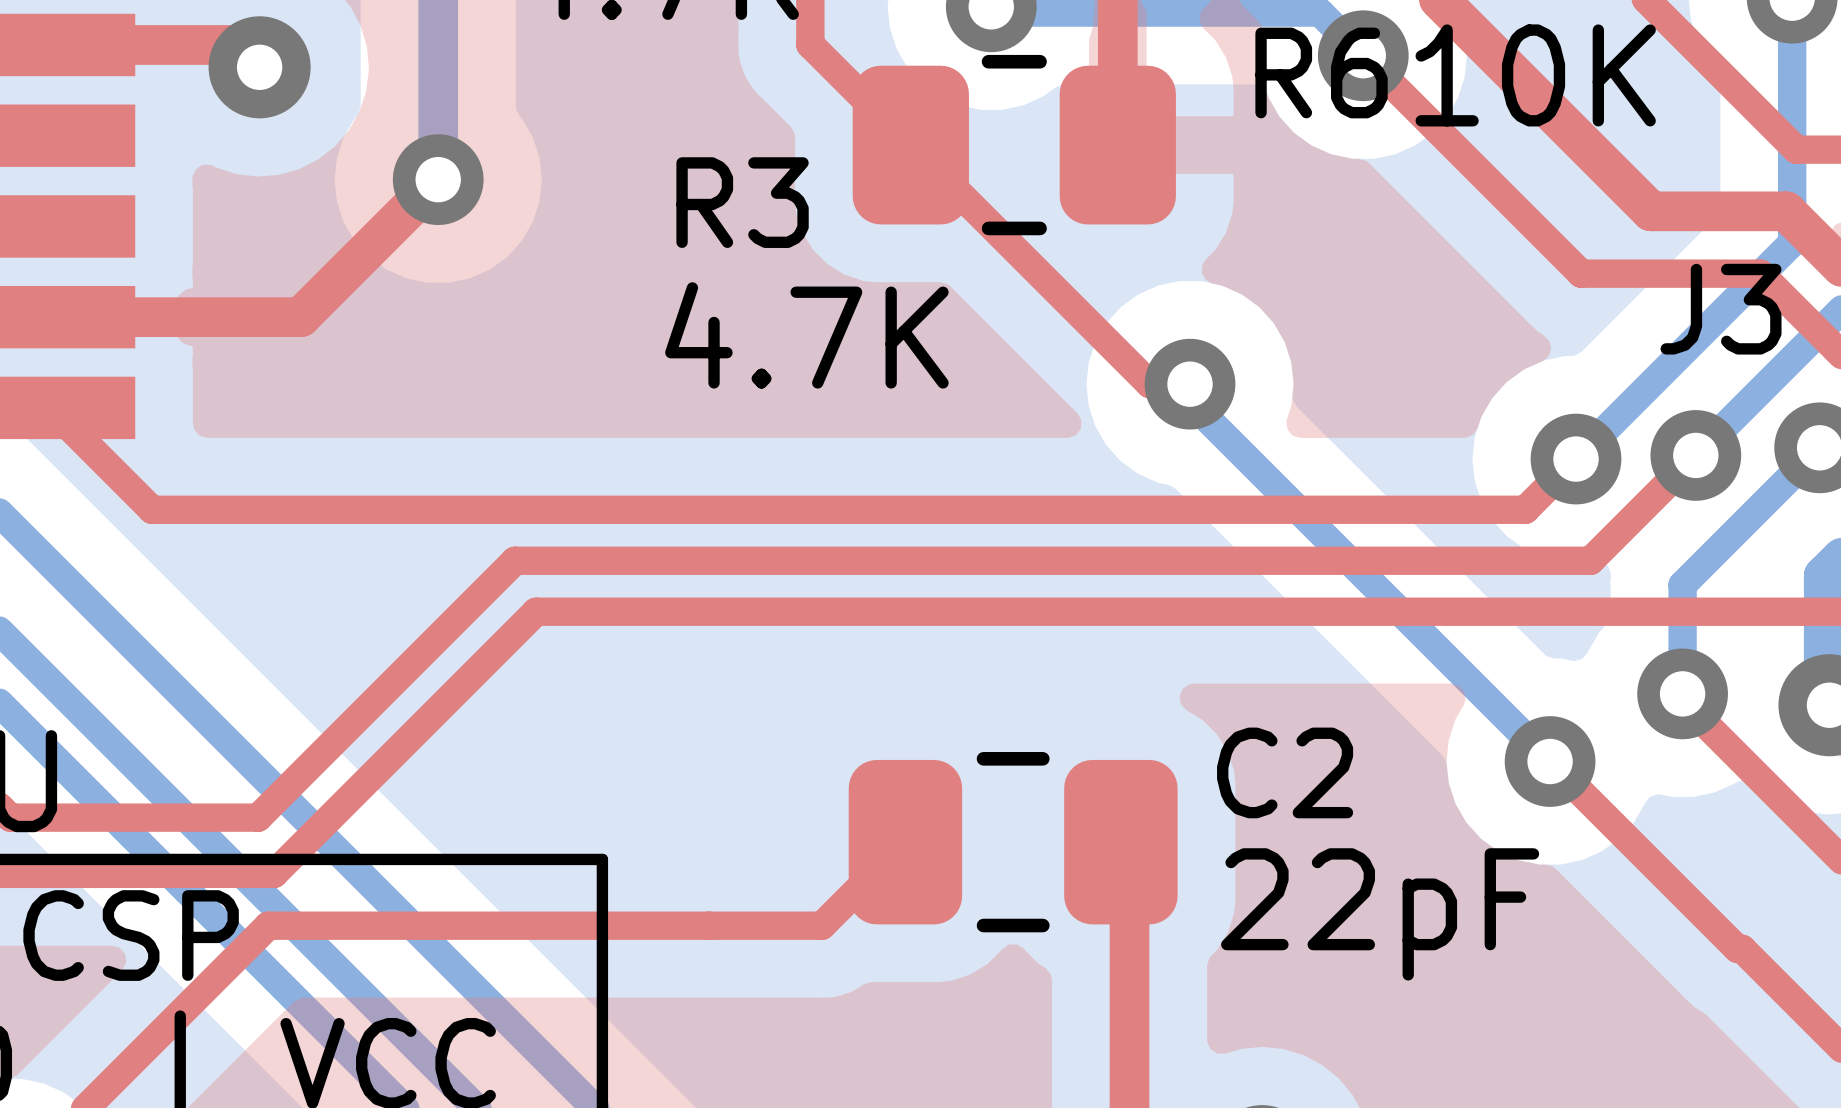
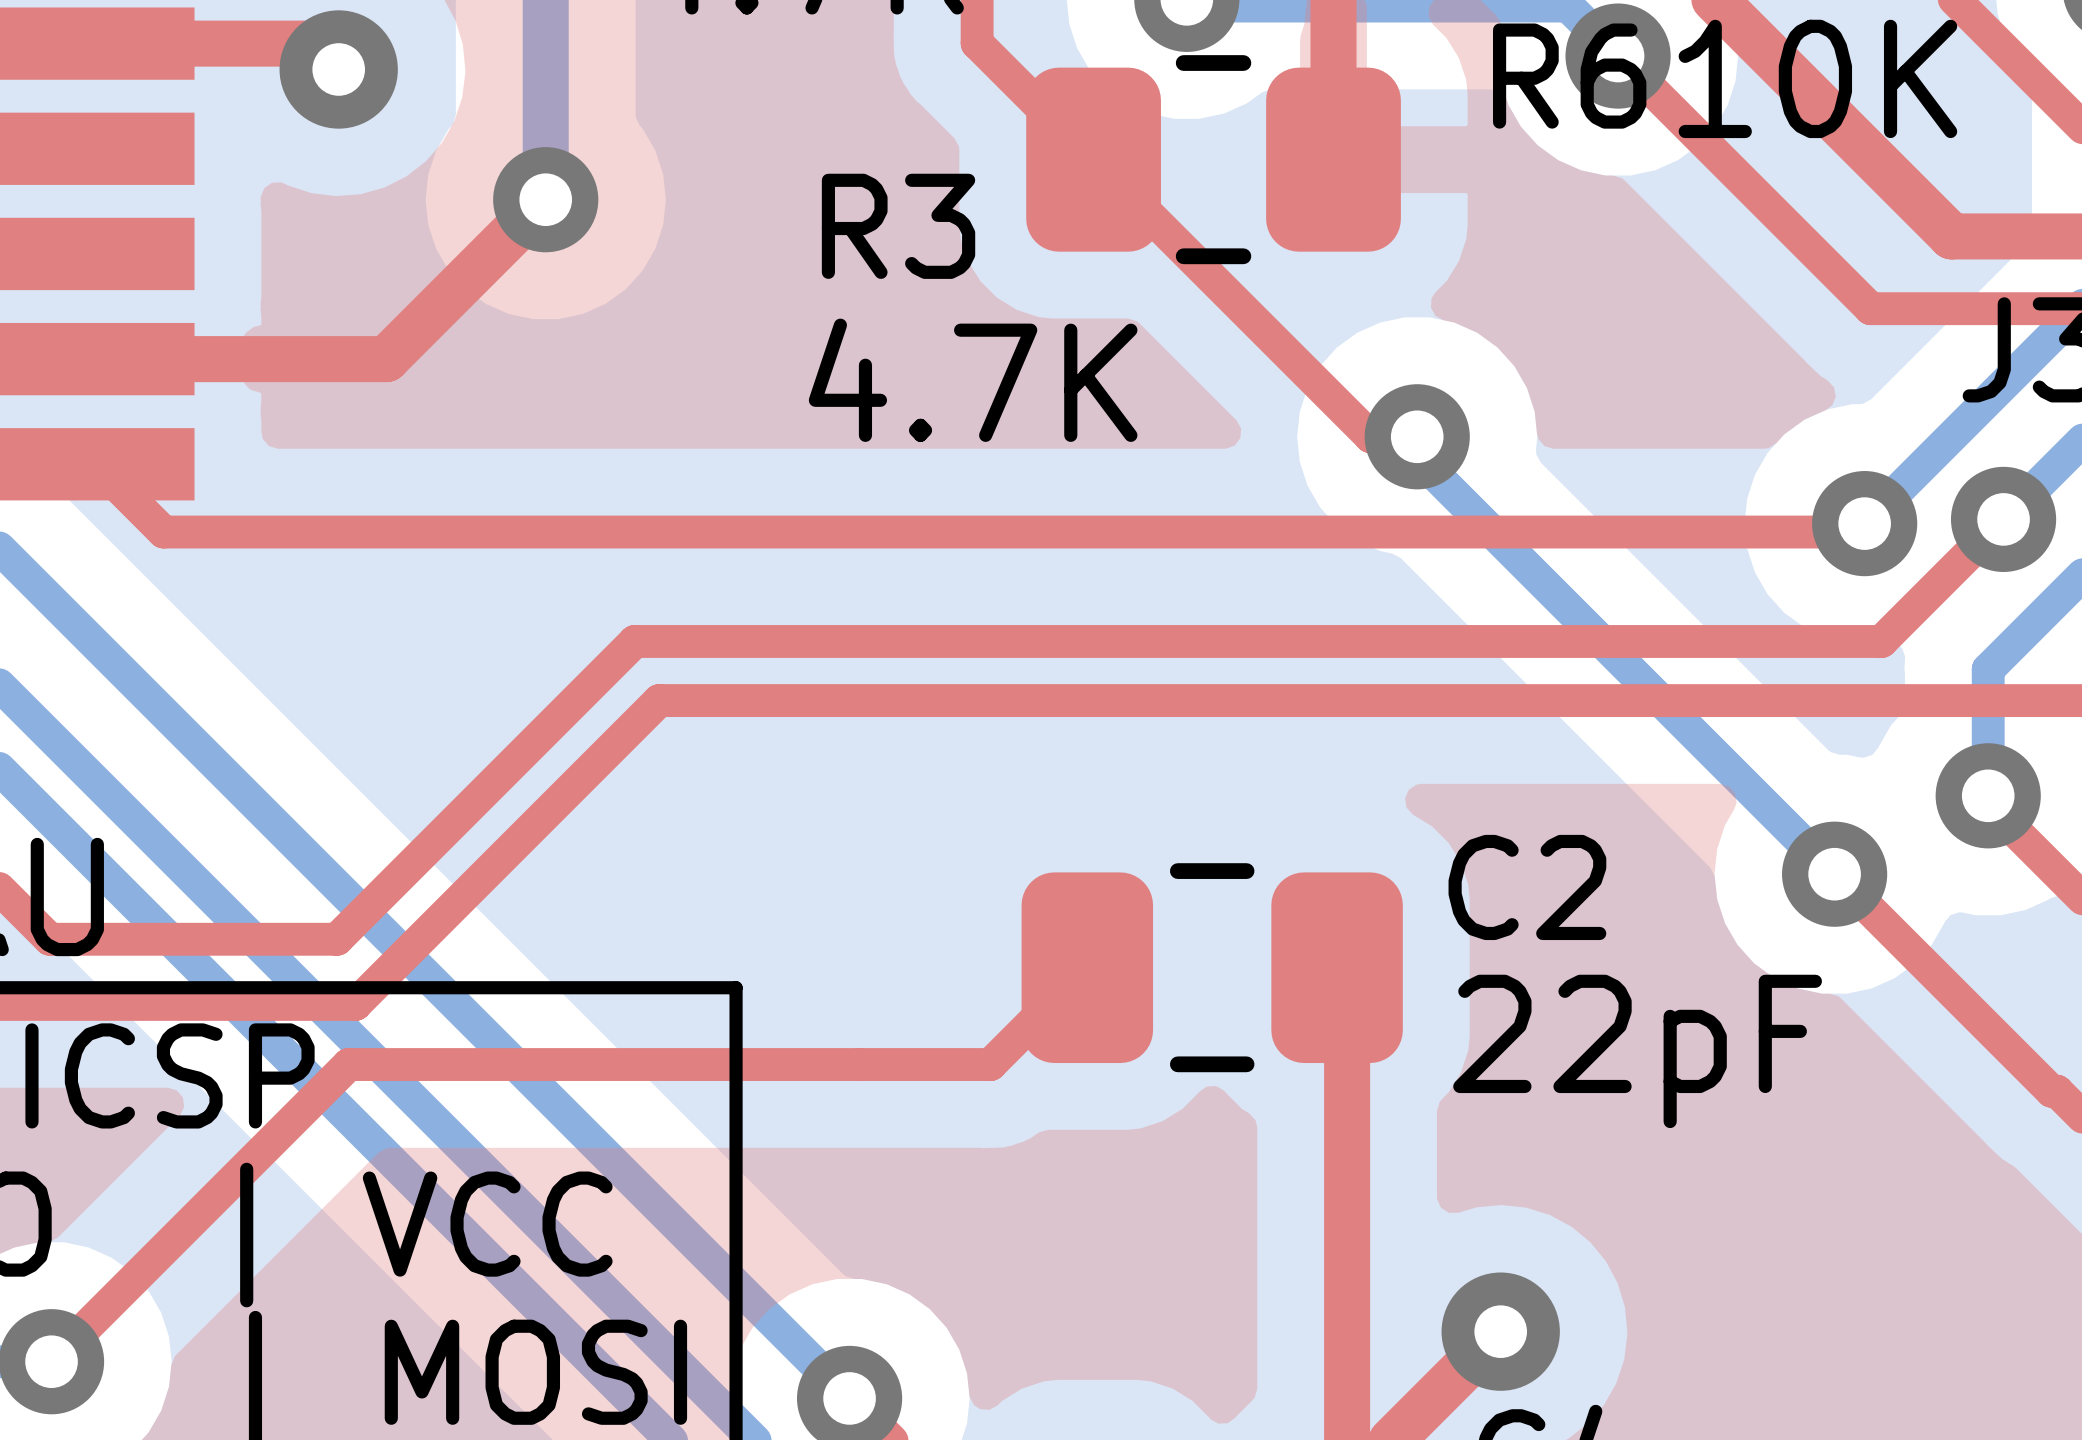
top track: (108, 466) (152, 509) (1525, 509) (1568, 466) -> (163, 532) (1856, 532)

